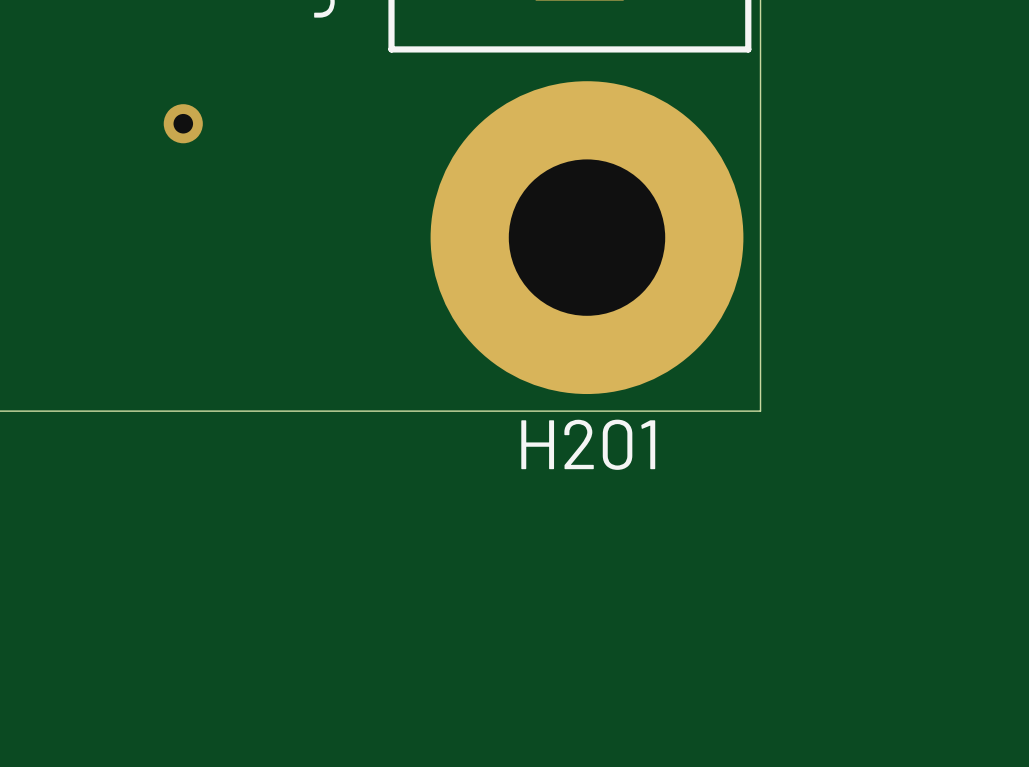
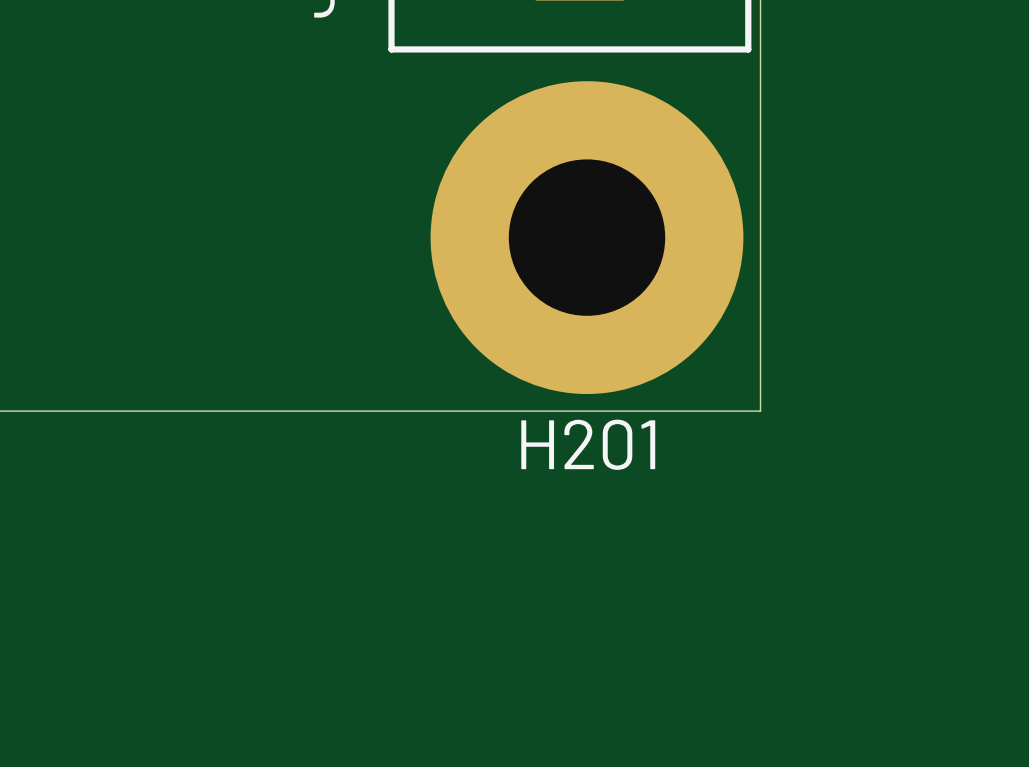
via: (183, 123) -> none

